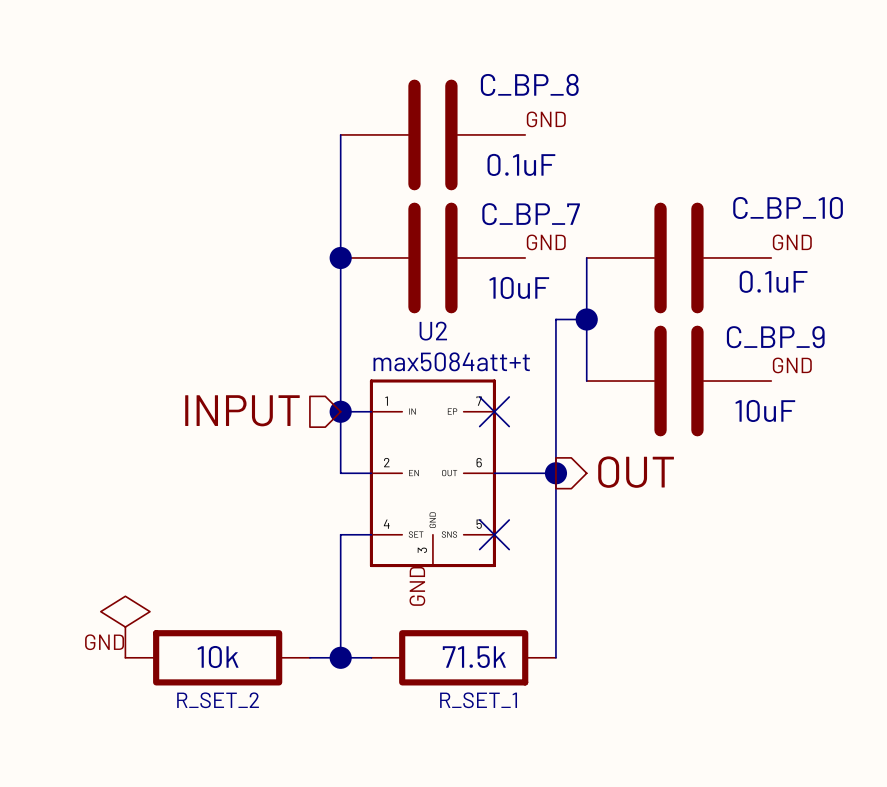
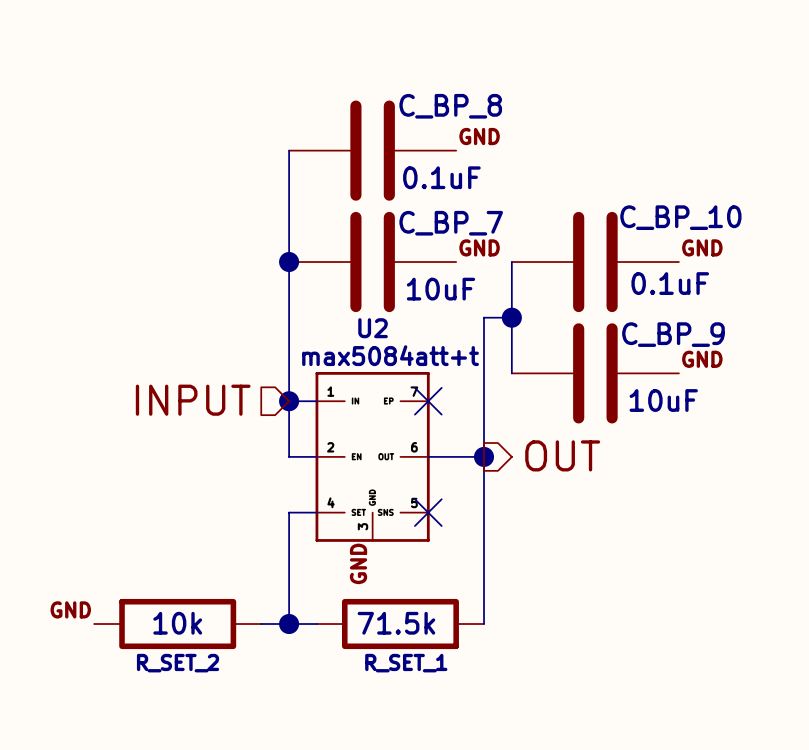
power symbol: (125, 627) -> none

